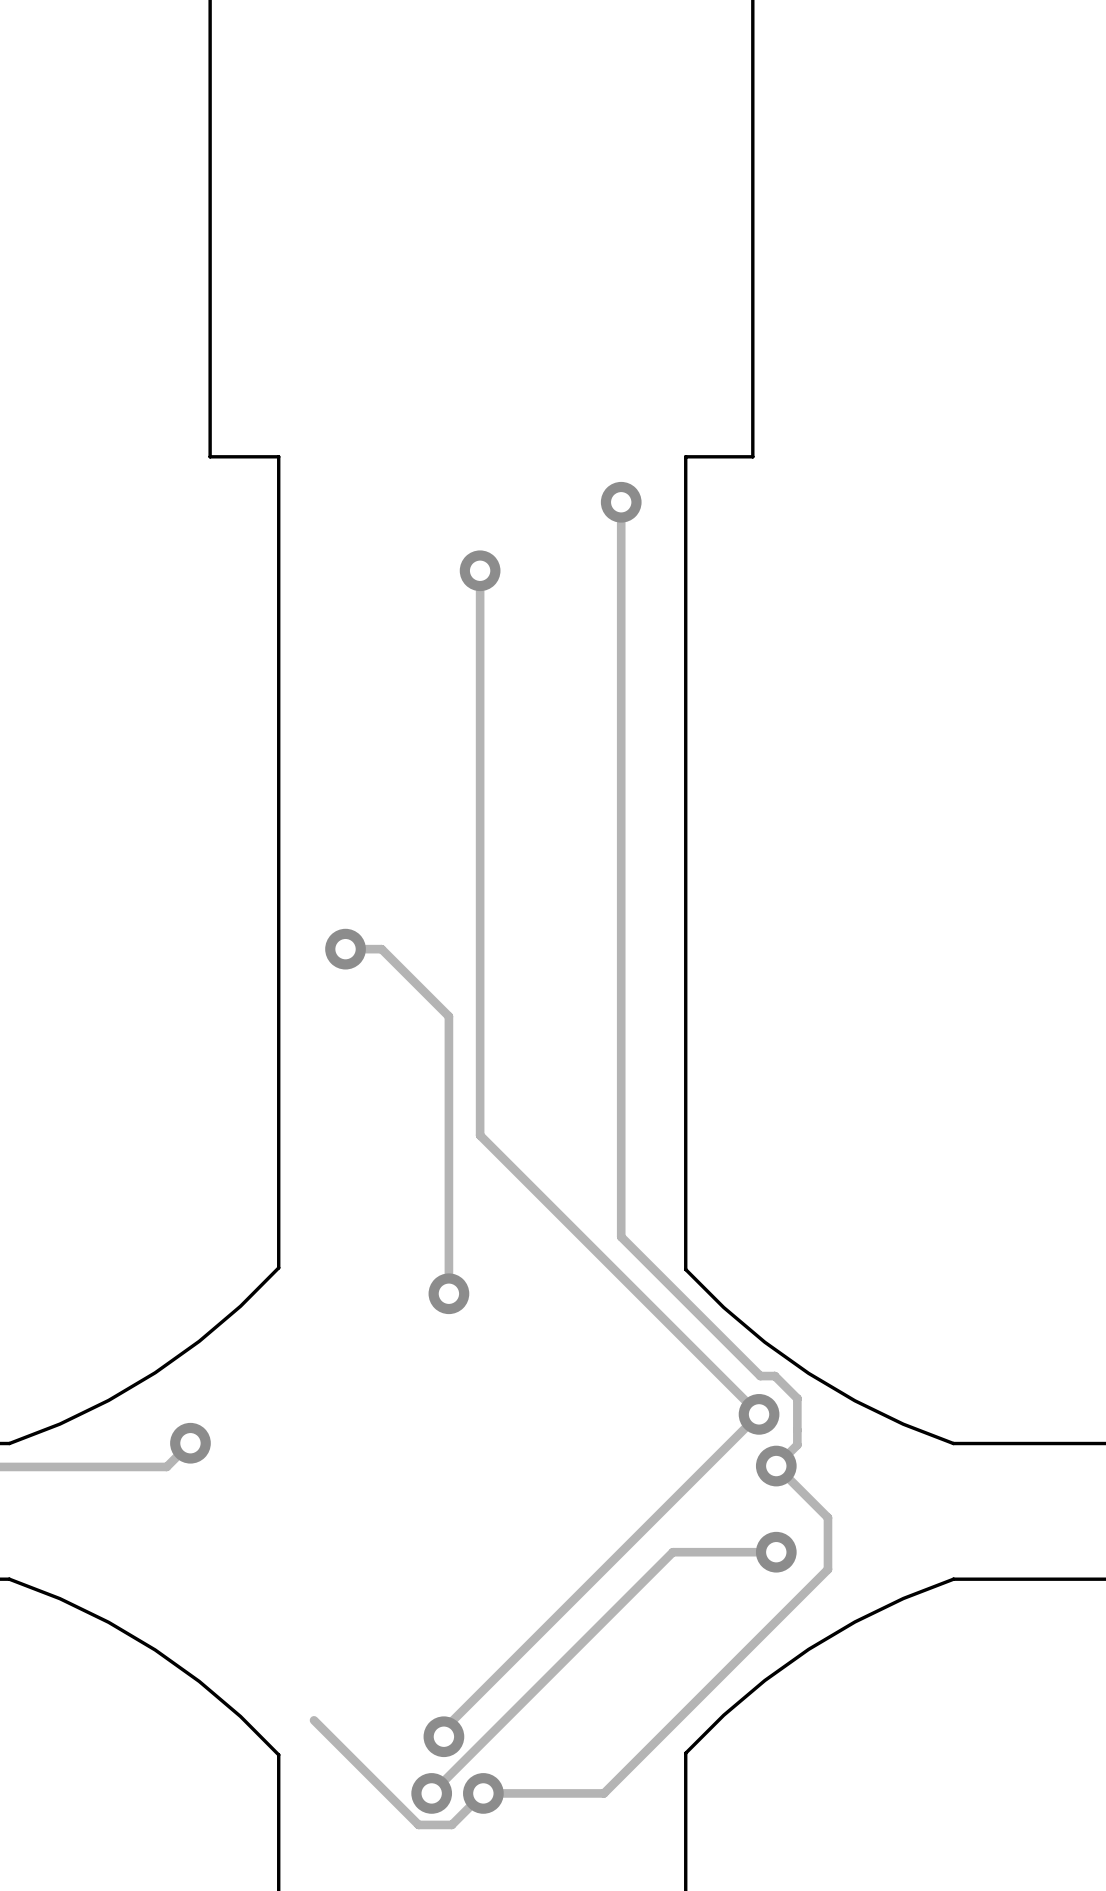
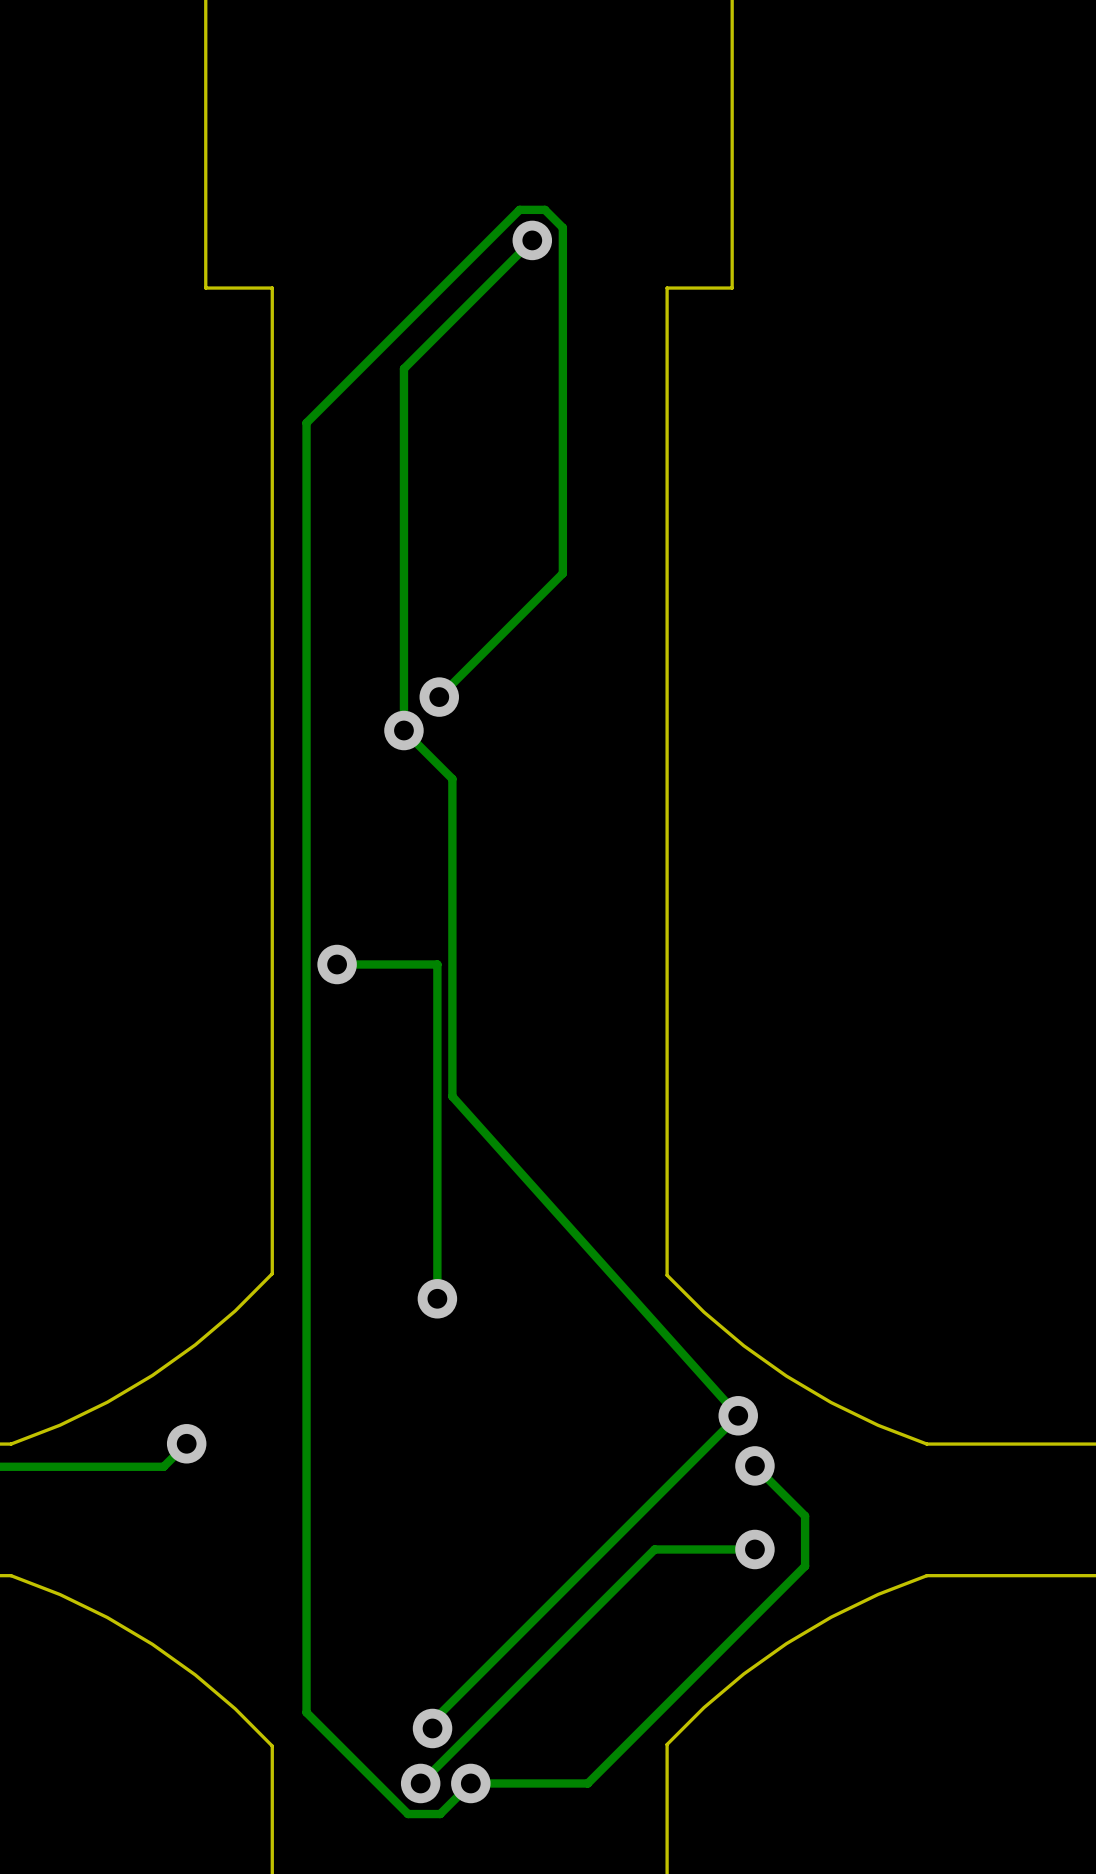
via: none -> (532, 240)
board edge: (210, 251) (210, 456) (278, 456) -> (205, 288) (272, 288) (272, 486)
board edge: (752, 251) (752, 456) (685, 456) -> (732, 288) (667, 288) (667, 486)
track: (621, 502) (621, 1236) (760, 1376) (774, 1376) (797, 1398) (797, 1444) (776, 1466) -> none
via: (621, 502) -> none
track: (480, 570) (480, 1135) (759, 1414) -> (532, 240) (403, 368) (403, 730) (452, 778) (452, 1096) (738, 1415)
via: (480, 570) -> none
track: none -> (439, 697) (562, 573) (562, 227) (544, 209) (519, 209) (306, 422) (306, 1712)
via: none -> (439, 697)
via: none -> (403, 730)
track: (381, 949) (448, 1016) -> (372, 964) (437, 964) (437, 1029)

